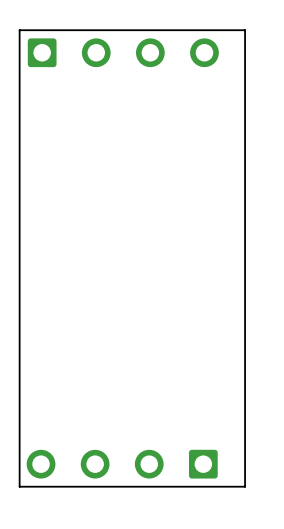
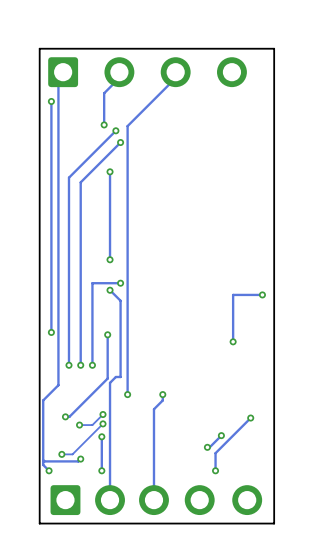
track: none -> (68, 72) (58, 82) (58, 385) (43, 400) (43, 464) (49, 470)
track: none -> (125, 72) (104, 93) (104, 124)
track: none -> (181, 72) (127, 126) (127, 394)
track: none -> (51, 101) (51, 332)
via: none -> (51, 101)
via: none -> (104, 124)
track: none -> (115, 130) (68, 177) (68, 365)
via: none -> (115, 130)
track: none -> (120, 142) (80, 182) (80, 365)
via: none -> (120, 142)
track: none -> (110, 171) (110, 259)
via: none -> (110, 171)
via: none -> (110, 259)
track: none -> (120, 283) (92, 283) (92, 365)
via: none -> (120, 283)
track: none -> (110, 290) (120, 300) (120, 377) (115, 377) (110, 382) (110, 500)
via: none -> (110, 290)
track: none -> (262, 294) (233, 294) (233, 341)
via: none -> (262, 294)
via: none -> (51, 332)
track: none -> (107, 334) (107, 378) (69, 416) (65, 416)
via: none -> (107, 334)
via: none -> (233, 341)
via: none -> (68, 365)
via: none -> (80, 365)
via: none -> (92, 365)
via: none -> (127, 394)
track: none -> (162, 394) (162, 400) (153, 409) (153, 500)
via: none -> (162, 394)
track: none -> (102, 414) (92, 425) (79, 425)
via: none -> (102, 414)
via: none -> (65, 416)
track: none -> (250, 418) (215, 453) (215, 470)
via: none -> (250, 418)
track: none -> (102, 423) (72, 454) (61, 454)
via: none -> (102, 423)
via: none -> (79, 425)
track: none -> (221, 435) (207, 447)
via: none -> (221, 435)
track: none -> (101, 436) (101, 470)
via: none -> (101, 436)
via: none -> (207, 447)
via: none -> (61, 454)
track: none -> (80, 459) (78, 461) (43, 460)
via: none -> (80, 459)
via: none -> (49, 470)
via: none -> (101, 470)
via: none -> (215, 470)
part footprint: [26, 449, 218, 479] -> [50, 485, 263, 516]

